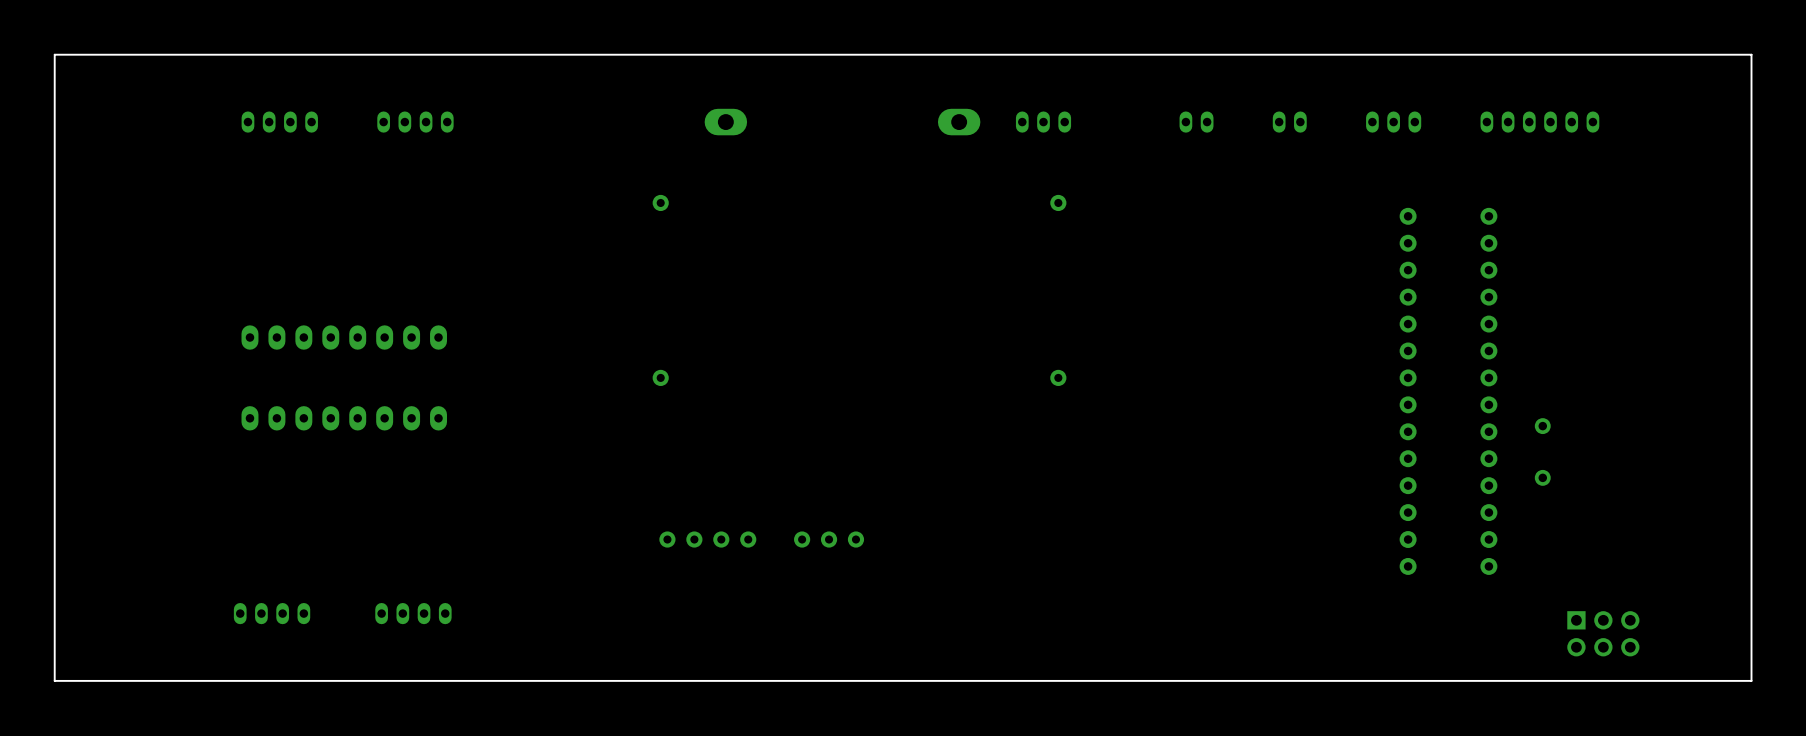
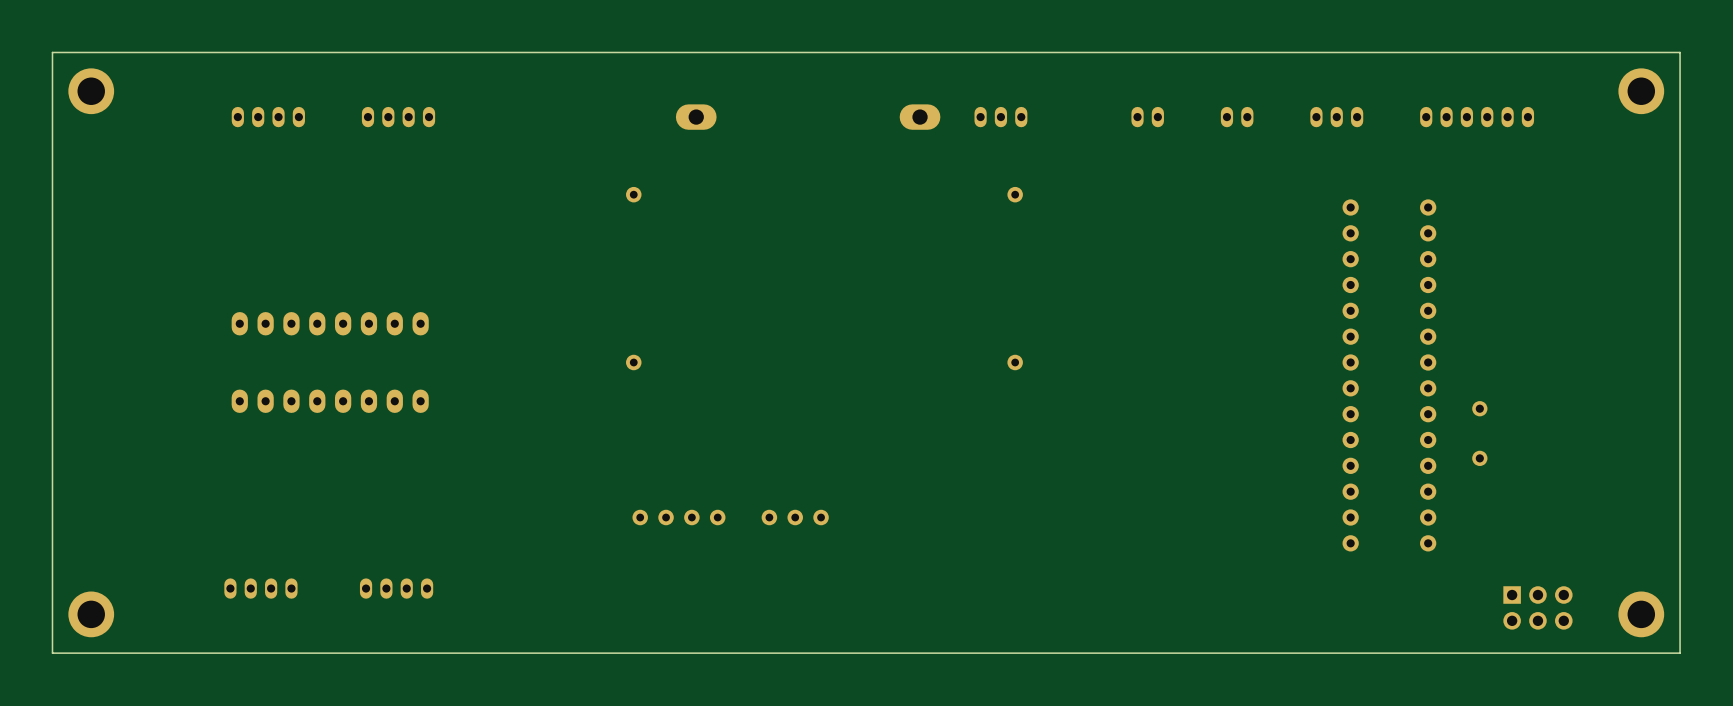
part: none -> (91, 91)
part: none -> (1641, 91)
part: none -> (91, 614)
part: none -> (1641, 614)

